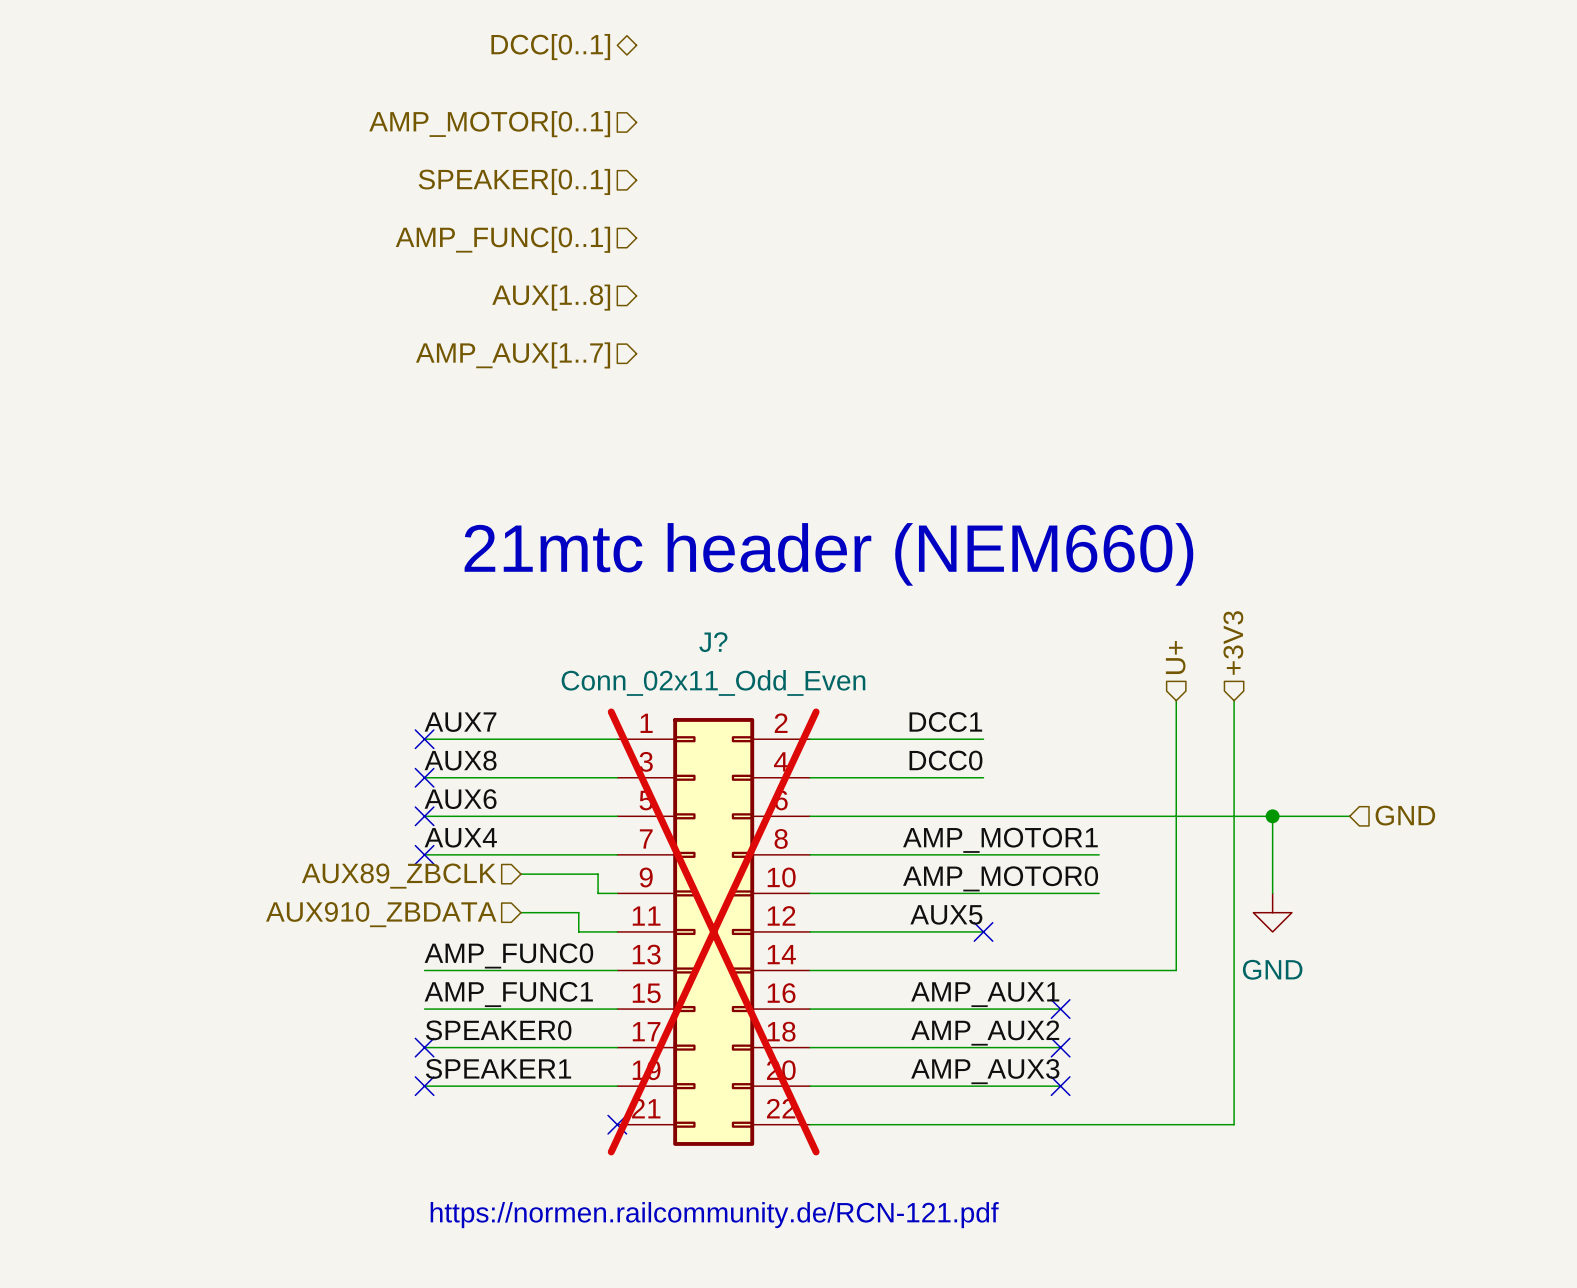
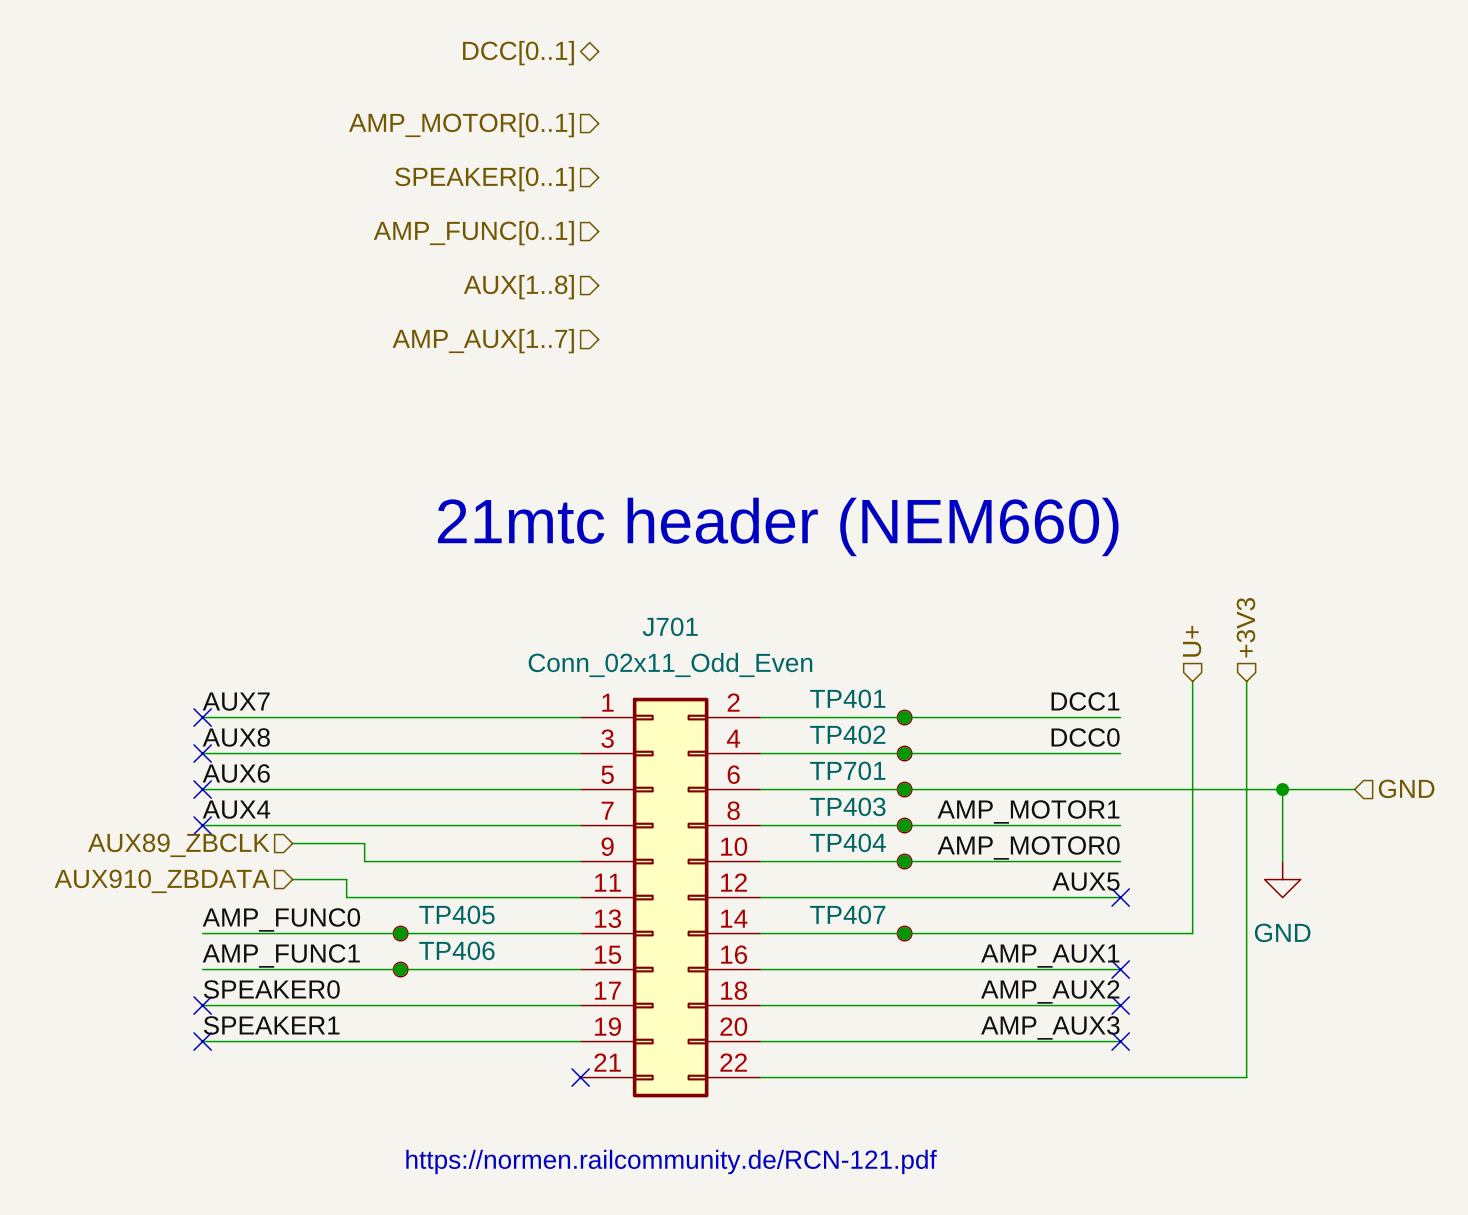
hierarchical label position: +3V3 (1233, 643) -> +3V3 (1245, 627)
hierarchical label position: U+ (1175, 657) -> U+ (1192, 641)
wire: (1176, 700) (1176, 970) (810, 970) -> none
wire: (1234, 700) (1234, 1124) (810, 1124) -> none
wire: none -> (1192, 681) (1192, 771)
wire: none -> (1246, 681) (1246, 1077) (760, 1077)
label position: AUX7 (460, 722) -> AUX7 (236, 701)
label position: DCC1 (945, 722) -> DCC1 (1085, 701)
wire: (424, 739) (617, 739) -> none
no-connect mark: (424, 739) -> none
wire: (810, 739) (983, 739) -> none
wire: none -> (202, 717) (580, 717)
no-connect mark: none -> (202, 717)
wire: none -> (760, 717) (1120, 717)
junction: none -> (904, 717)
TP401: none -> (904, 717)
label position: AUX8 (460, 760) -> AUX8 (236, 737)
label position: DCC0 (945, 760) -> DCC0 (1085, 737)
wire: (424, 777) (617, 777) -> none
no-connect mark: (424, 777) -> none
wire: (810, 777) (983, 777) -> none
wire: none -> (202, 753) (580, 753)
no-connect mark: none -> (202, 753)
wire: none -> (760, 753) (1120, 753)
junction: none -> (904, 753)
TP402: none -> (904, 753)
label position: AUX6 (460, 799) -> AUX6 (236, 773)
hierarchical label position: GND (1405, 815) -> GND (1406, 788)
wire: (424, 816) (617, 816) -> none
no-connect mark: (424, 816) -> none
wire: (810, 816) (1349, 816) -> none
junction: (1272, 816) -> none
wire: none -> (202, 789) (580, 789)
no-connect mark: none -> (202, 789)
wire: none -> (760, 789) (1354, 789)
junction: none -> (904, 789)
TP701: none -> (904, 789)
wire: none -> (1282, 789) (1282, 861)
junction: none -> (1282, 789)
label position: AUX4 (460, 837) -> AUX4 (236, 809)
label position: AMP_MOTOR1 (1000, 840) -> AMP_MOTOR1 (1028, 811)
wire: (424, 854) (617, 854) -> none
no-connect mark: (424, 854) -> none
wire: (810, 854) (1099, 854) -> none
wire: none -> (202, 825) (490, 825)
no-connect mark: none -> (202, 825)
wire: (598, 874) (598, 893) (617, 893) -> (562, 825) (580, 825)
wire: none -> (760, 825) (1120, 825)
junction: none -> (904, 825)
TP403: none -> (904, 825)
hierarchical label position: AUX89_ZBCLK (399, 876) -> AUX89_ZBCLK (178, 845)
label position: AMP_MOTOR0 (1000, 878) -> AMP_MOTOR0 (1028, 847)
wire: none -> (292, 843) (364, 843) (364, 861) (490, 861)
wire: (810, 893) (1099, 893) -> none
wire: none -> (1192, 843) (1192, 933) (760, 933)
wire: (578, 912) (578, 931) (617, 931) -> (544, 861) (580, 861)
wire: none -> (760, 861) (1120, 861)
junction: none -> (904, 861)
TP404: none -> (904, 861)
power symbol position: GND (1272, 912) -> GND (1282, 879)
hierarchical label position: AUX910_ZBDATA (381, 914) -> AUX910_ZBDATA (162, 881)
label position: AUX5 (946, 914) -> AUX5 (1085, 881)
wire: none -> (292, 879) (346, 879) (346, 897) (580, 897)
J?: Conn_02x11_Odd_Even (713, 931) -> none
wire: (810, 931) (983, 931) -> none
no-connect mark: (983, 931) -> none
J701: none -> Conn_02x11_Odd_Even (670, 897)
wire: none -> (760, 897) (1120, 897)
no-connect mark: none -> (1120, 897)
label position: AMP_FUNC0 (508, 955) -> AMP_FUNC0 (281, 919)
wire: (424, 970) (617, 970) -> none
wire: none -> (202, 933) (580, 933)
junction: none -> (400, 933)
TP405: none -> (400, 933)
junction: none -> (904, 933)
TP407: none -> (904, 933)
label position: AMP_FUNC1 (508, 994) -> AMP_FUNC1 (281, 955)
label position: AMP_AUX1 (985, 994) -> AMP_AUX1 (1050, 956)
wire: (424, 1009) (617, 1009) -> none
wire: (810, 1009) (1060, 1009) -> none
no-connect mark: (1060, 1009) -> none
wire: none -> (202, 969) (580, 969)
junction: none -> (400, 969)
TP406: none -> (400, 969)
wire: none -> (760, 969) (1120, 969)
no-connect mark: none -> (1120, 969)
label position: SPEAKER0 (498, 1030) -> SPEAKER0 (271, 989)
label position: AMP_AUX2 (985, 1033) -> AMP_AUX2 (1050, 991)
wire: (424, 1047) (617, 1047) -> none
no-connect mark: (424, 1047) -> none
wire: (810, 1047) (1060, 1047) -> none
no-connect mark: (1060, 1047) -> none
wire: none -> (202, 1005) (580, 1005)
no-connect mark: none -> (202, 1005)
wire: none -> (760, 1005) (1120, 1005)
no-connect mark: none -> (1120, 1005)
label position: SPEAKER1 (498, 1068) -> SPEAKER1 (271, 1025)
label position: AMP_AUX3 (985, 1071) -> AMP_AUX3 (1050, 1027)
wire: (424, 1086) (617, 1086) -> none
no-connect mark: (424, 1086) -> none
wire: (810, 1086) (1060, 1086) -> none
no-connect mark: (1060, 1086) -> none
wire: none -> (202, 1041) (580, 1041)
no-connect mark: none -> (202, 1041)
wire: none -> (760, 1041) (1120, 1041)
no-connect mark: none -> (1120, 1041)
no-connect mark position: (617, 1124) -> (580, 1077)
text position: https://normen.railcommunity.de/RCN-121.pdf (714, 1215) -> https://normen.railcommunity.de/RCN-121.pdf (671, 1161)

